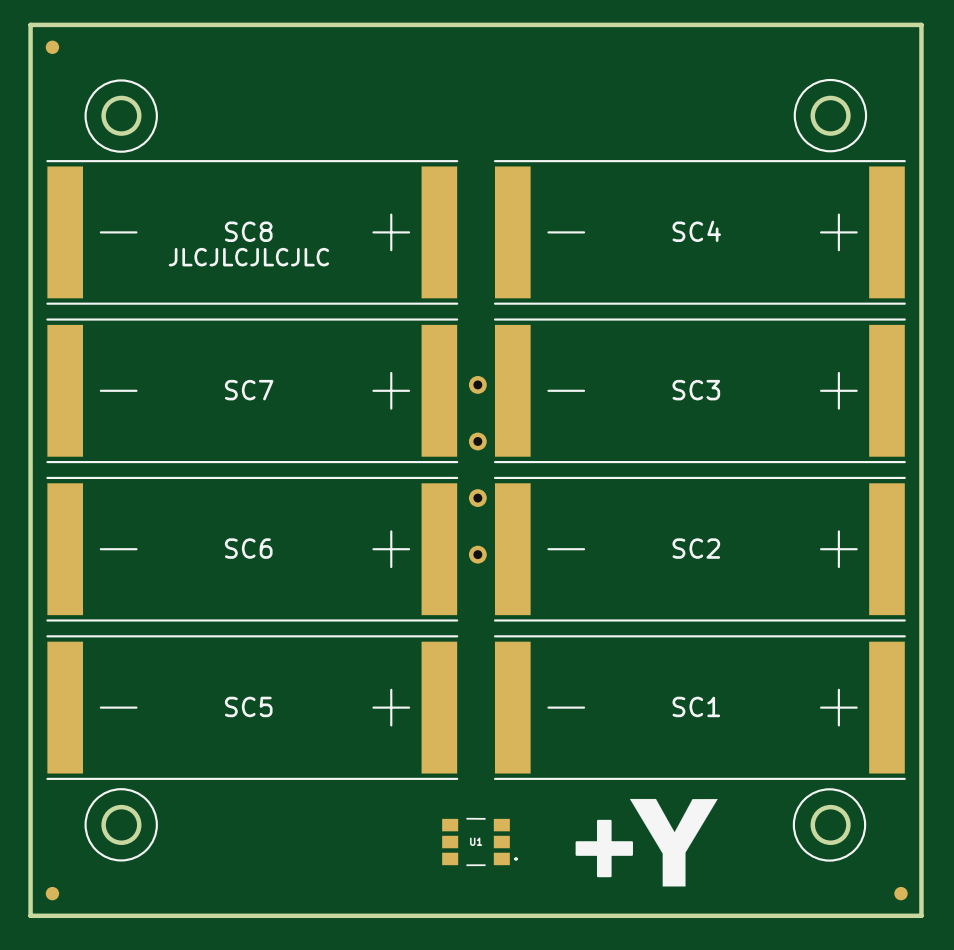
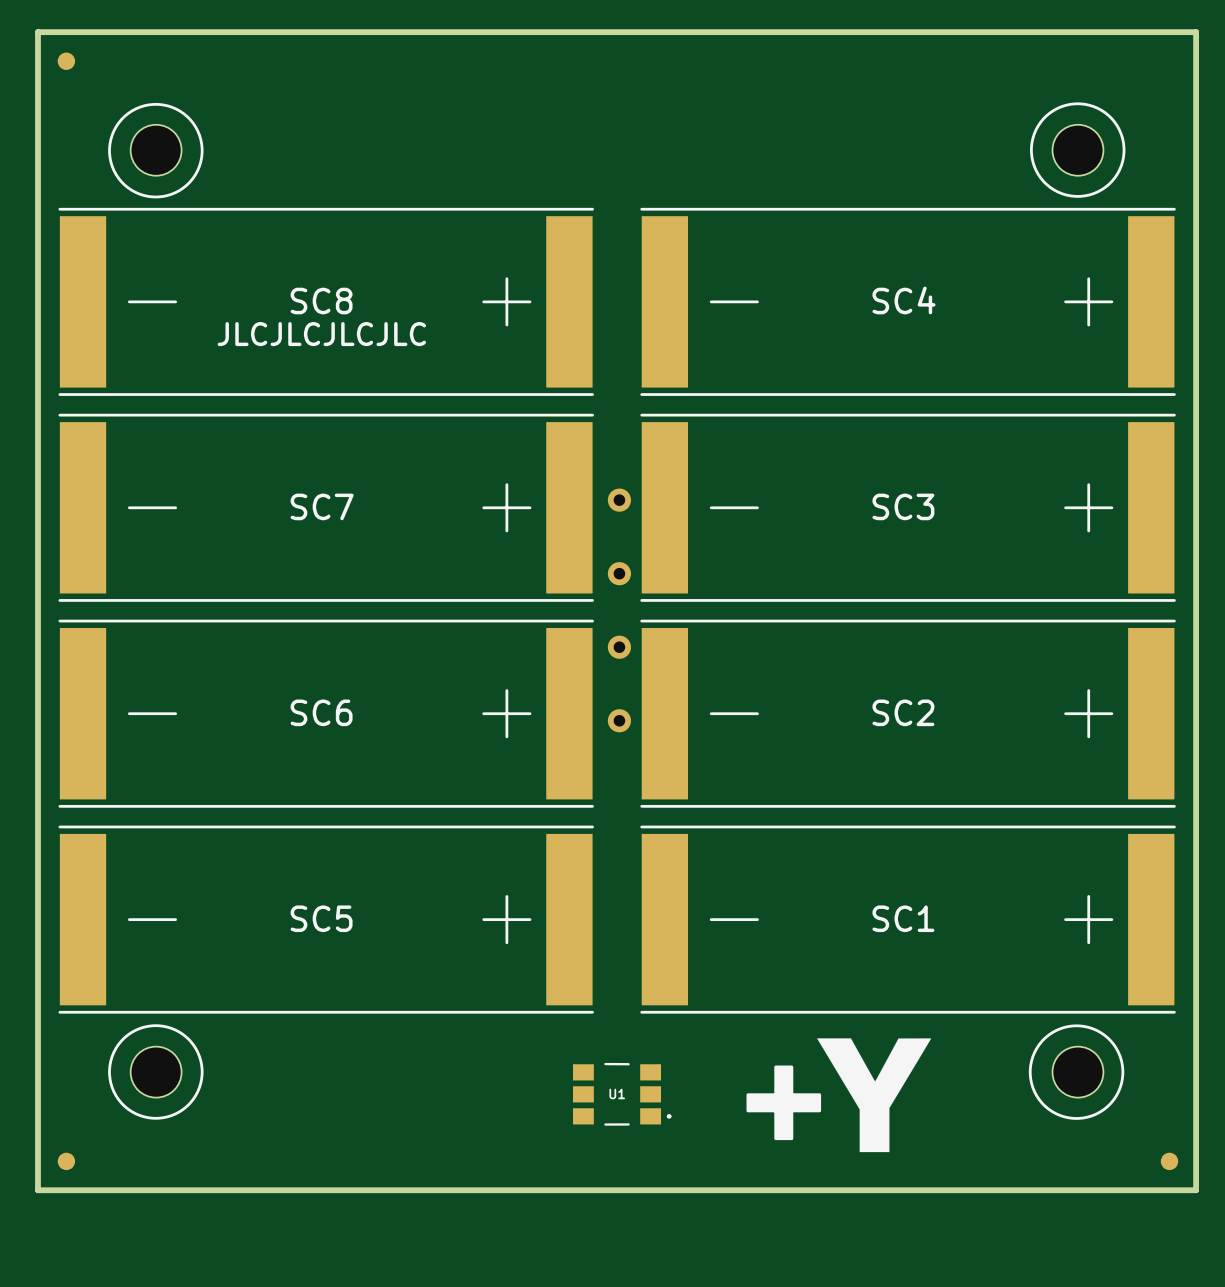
round board edge: [101, 95, 142, 136] -> none
round board edge: [810, 95, 851, 136] -> none
part: none -> (156, 150)
part: none -> (1077, 150)
round board edge: [101, 804, 142, 845] -> none
round board edge: [810, 804, 851, 845] -> none
part: none -> (156, 1072)
part: none -> (1077, 1072)

